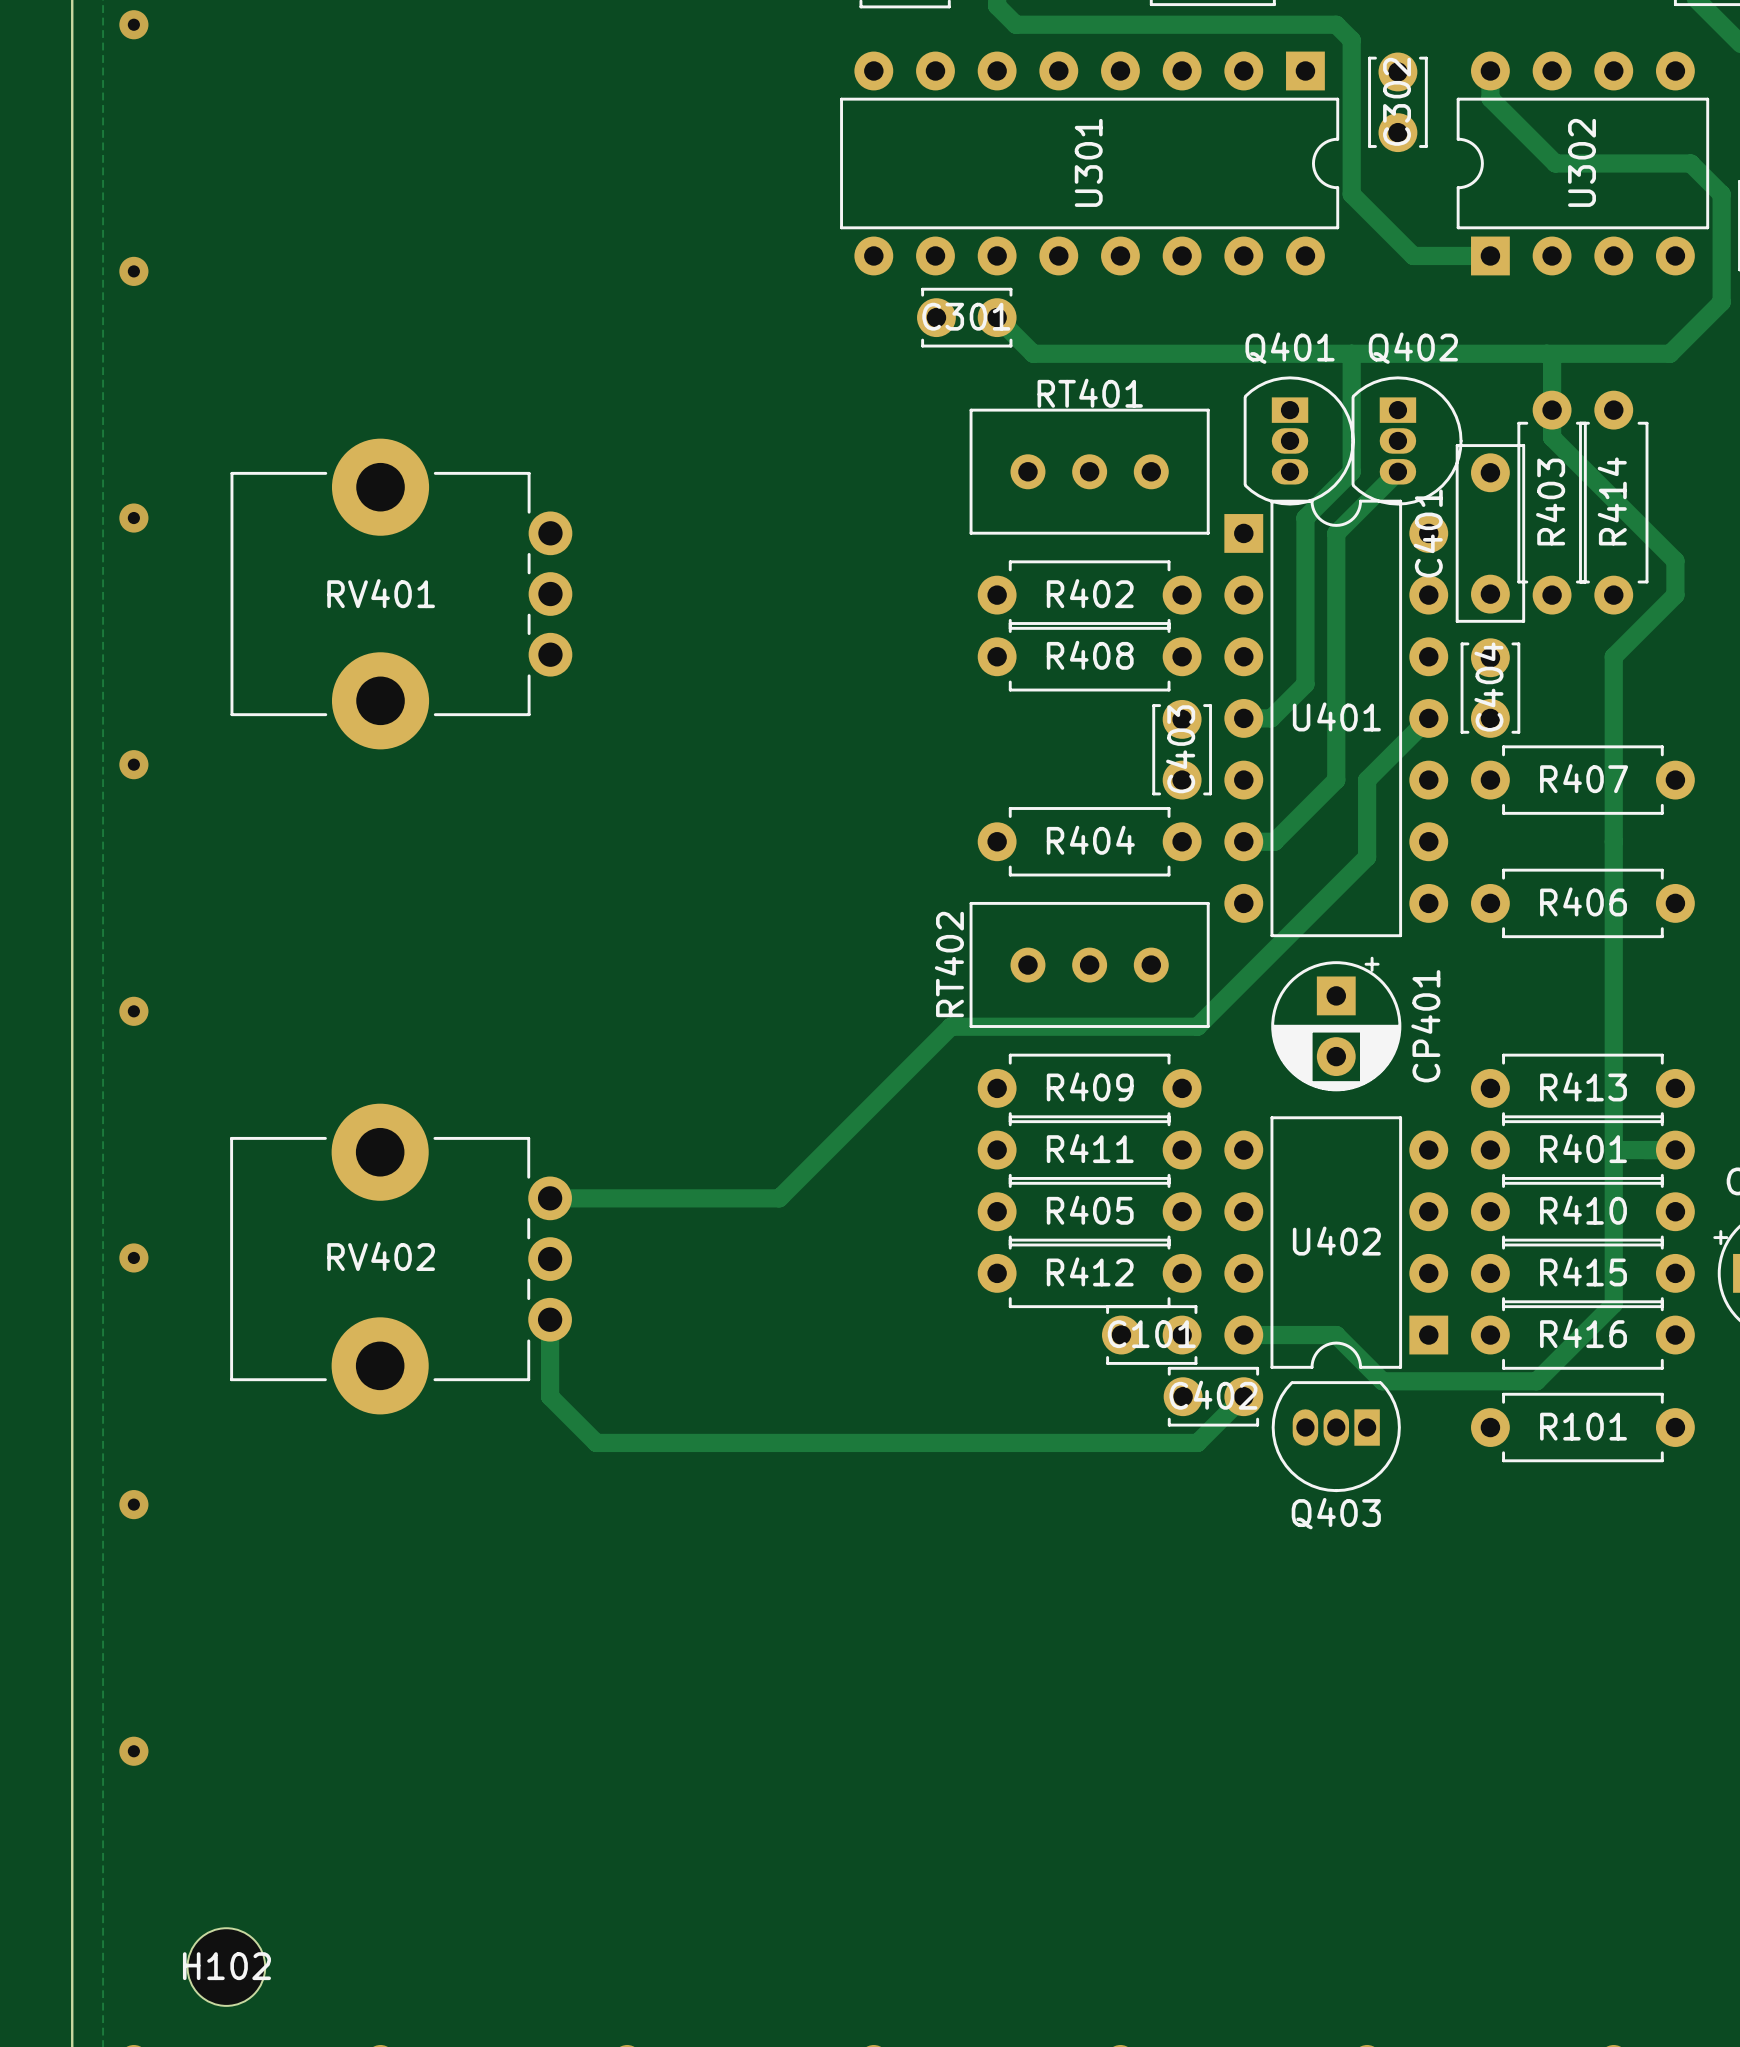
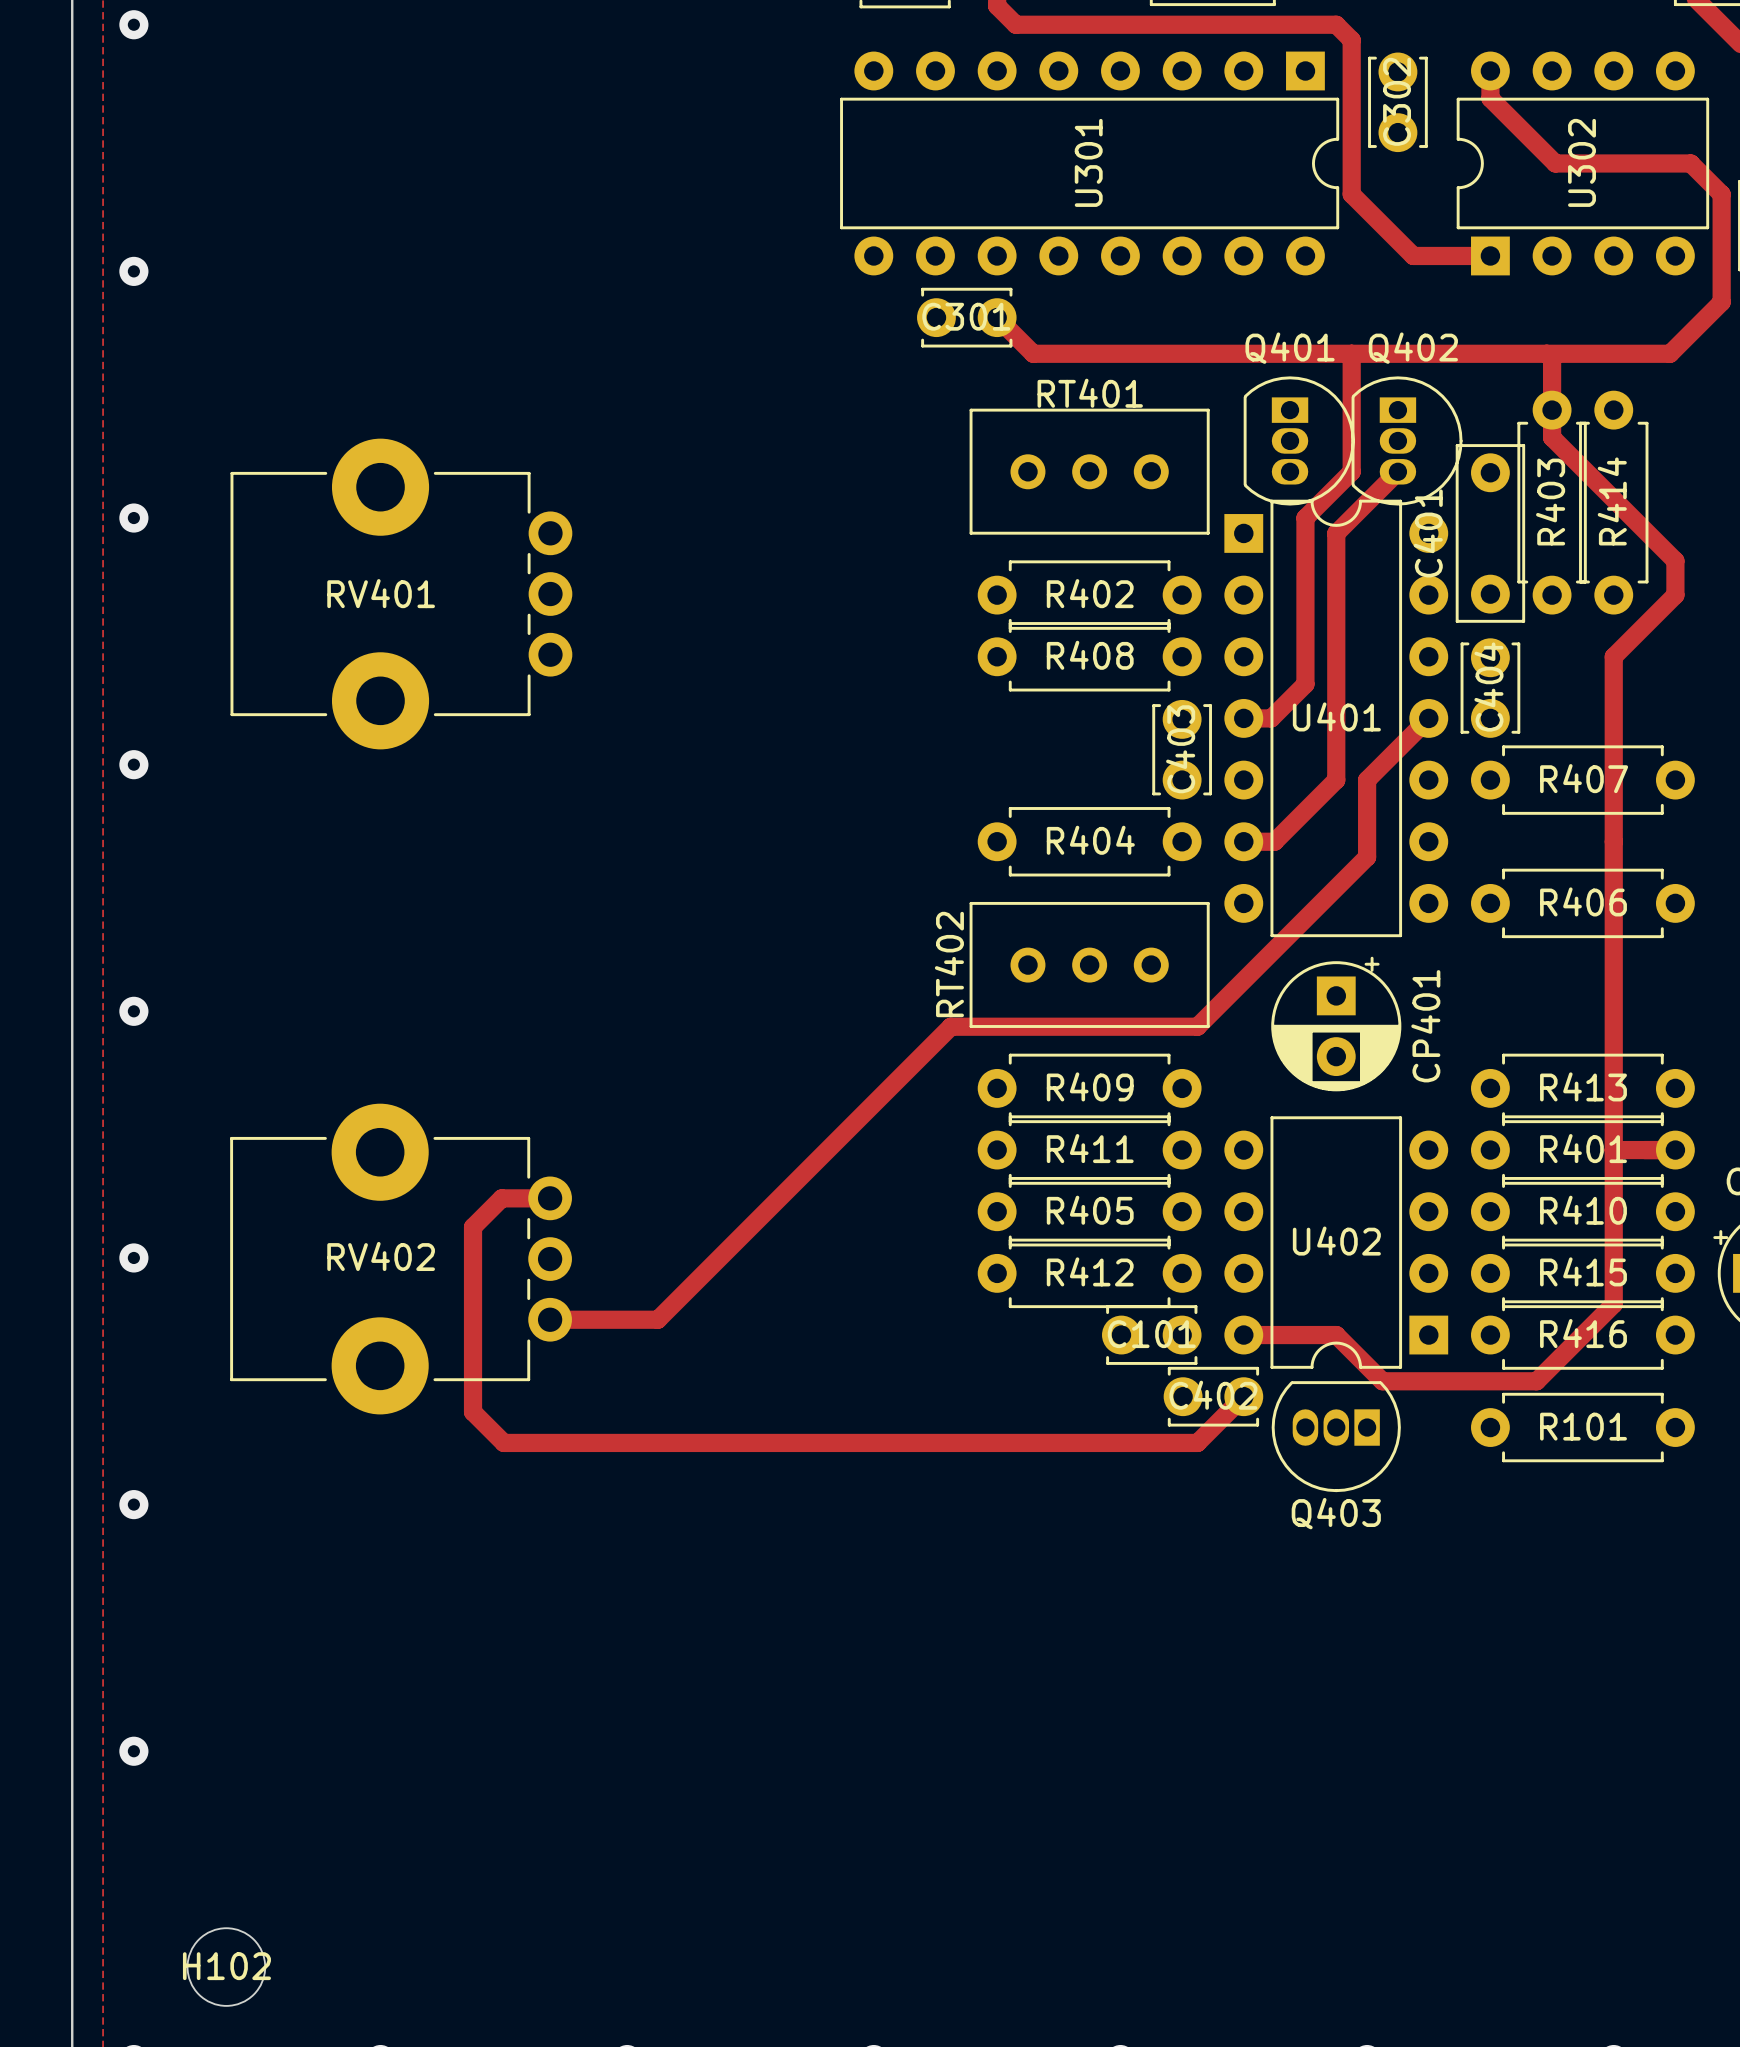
track: (550, 1198) (779, 1198) -> (550, 1319) (657, 1319) (779, 1198)
track: (550, 1319) (550, 1396) (596, 1442) -> (550, 1198) (501, 1198) (473, 1227) (473, 1412) (503, 1442) (596, 1442)

